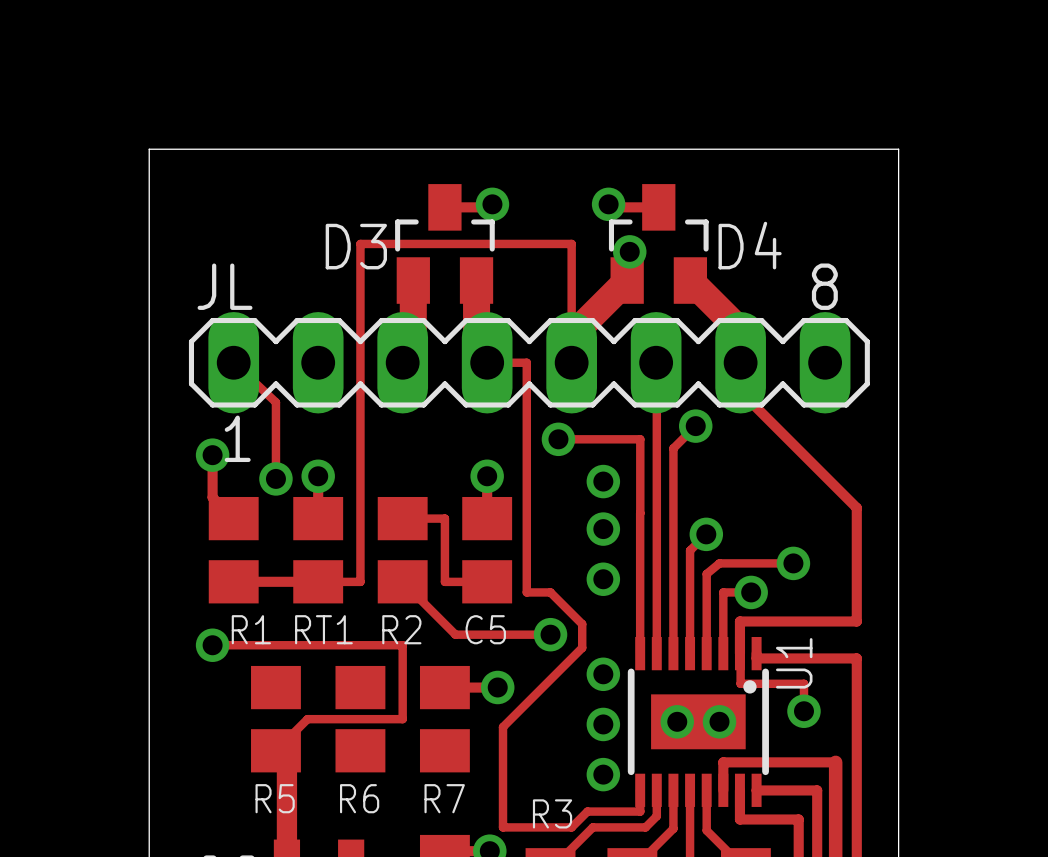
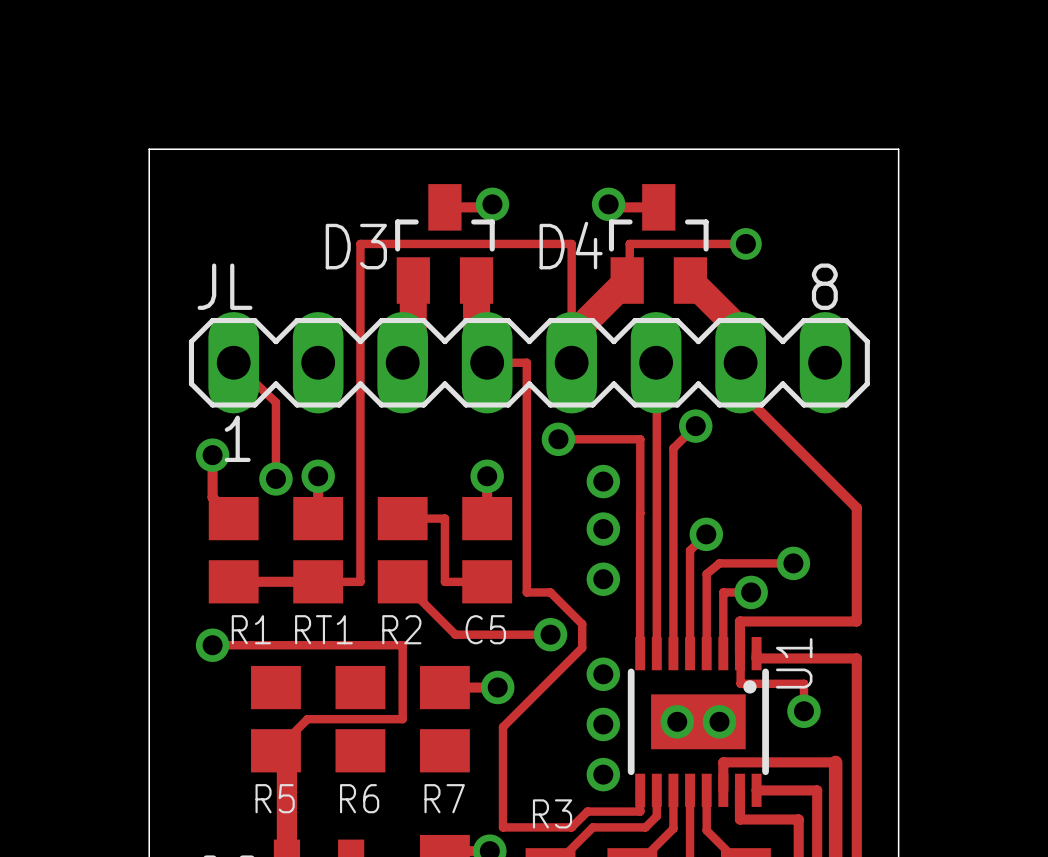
track: none -> (745, 243) (629, 243) (629, 251)
via: none -> (745, 243)
D4 name position: D4 (750, 245) -> D4 (571, 245)
via: (629, 251) -> none

